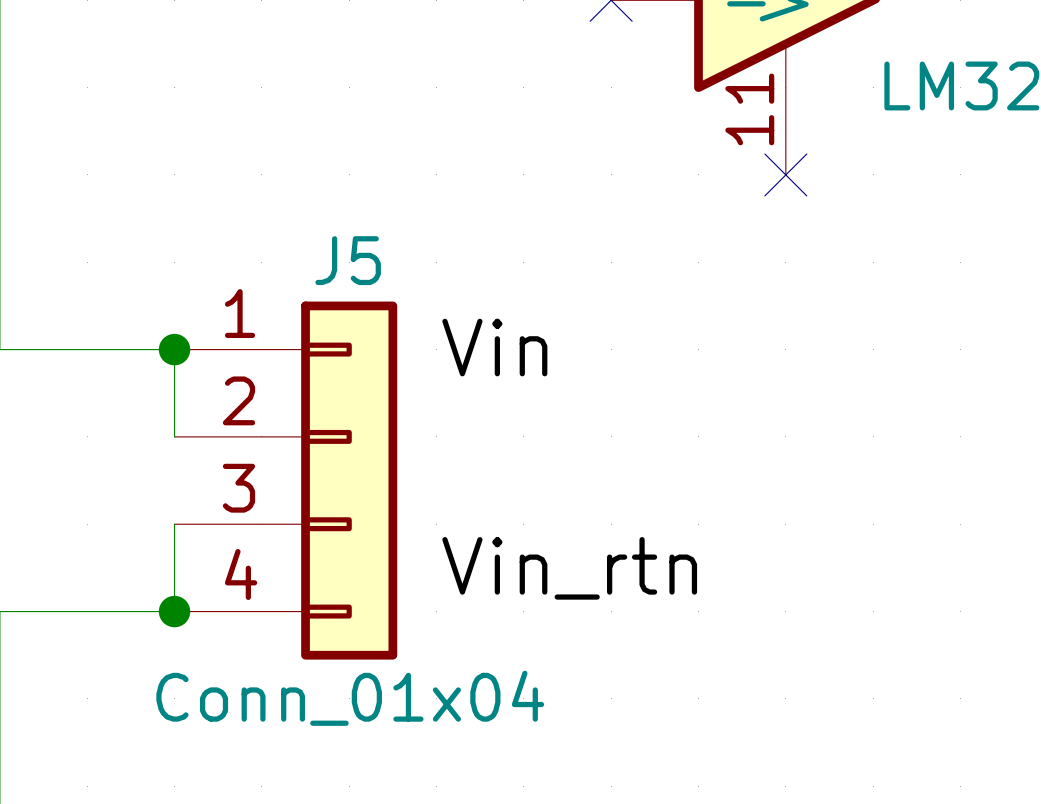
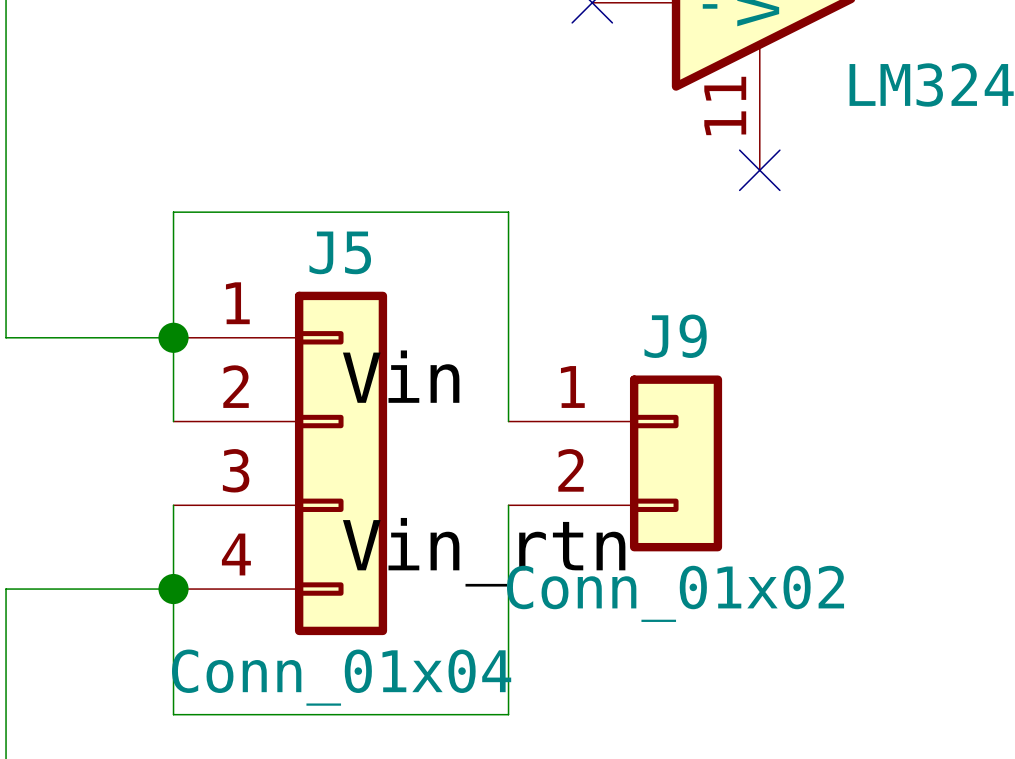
label position: Vin (494, 347) -> Vin (401, 376)
wire: none -> (173, 337) (173, 212) (508, 212) (508, 421)
J9: none -> Conn_01x02 (615, 463)
wire: none -> (508, 505) (508, 714) (173, 714) (173, 589)
label position: Vin_rtn (569, 568) -> Vin_rtn (484, 552)

